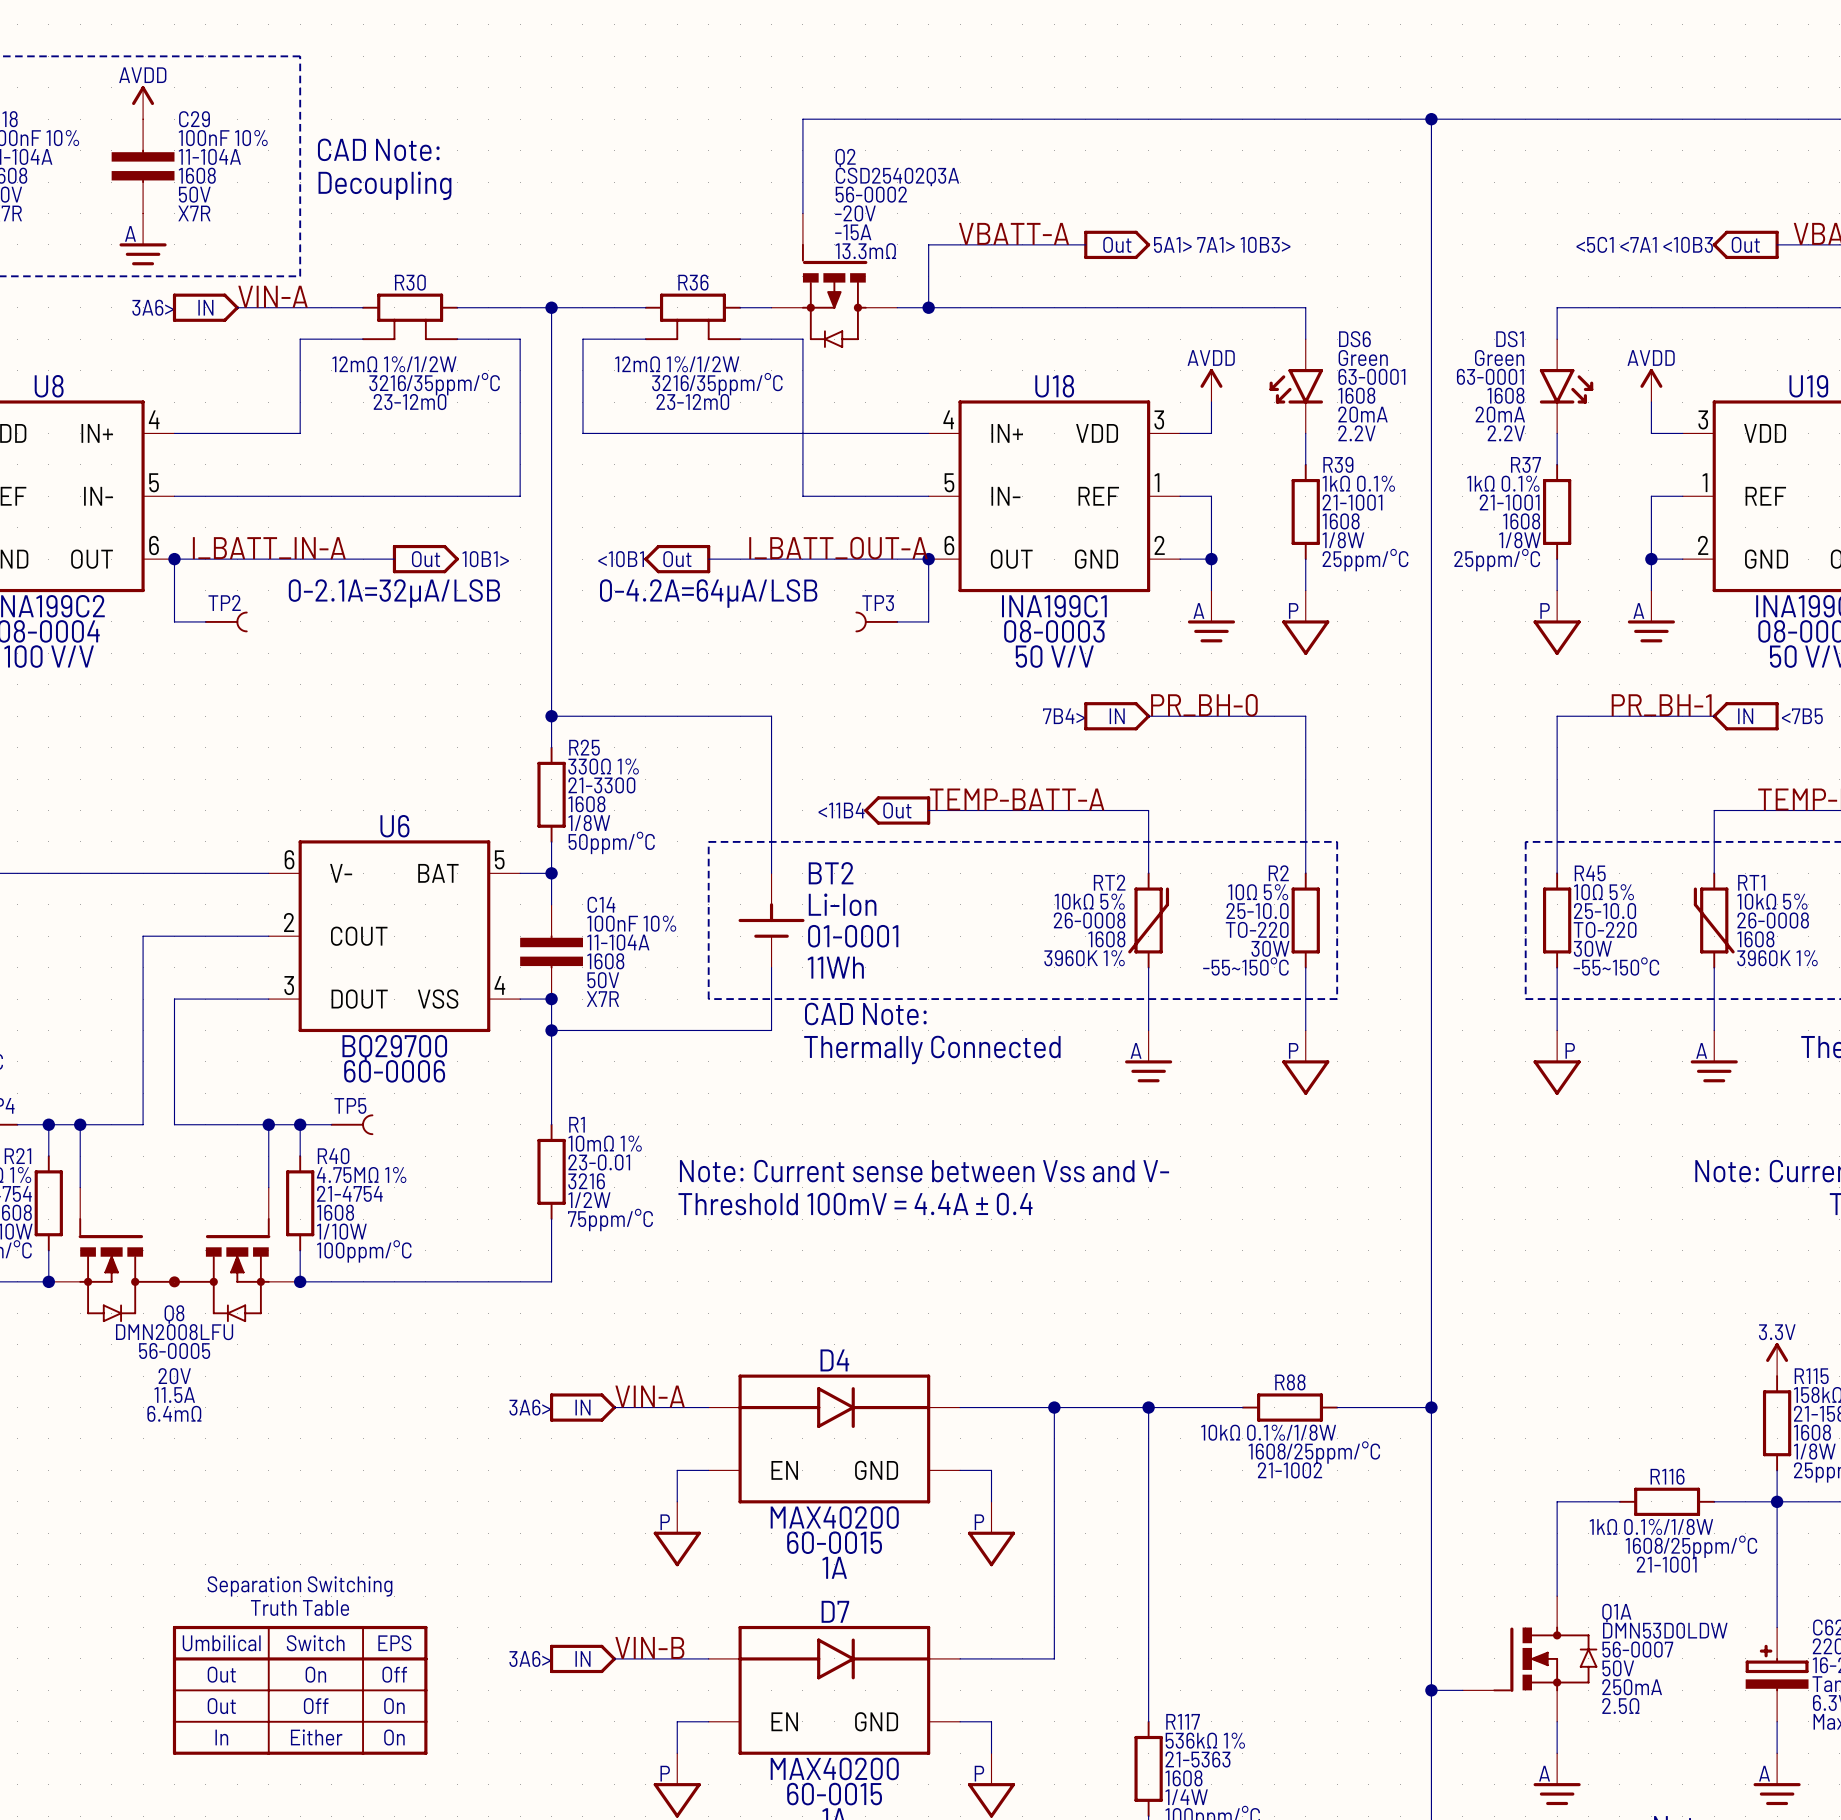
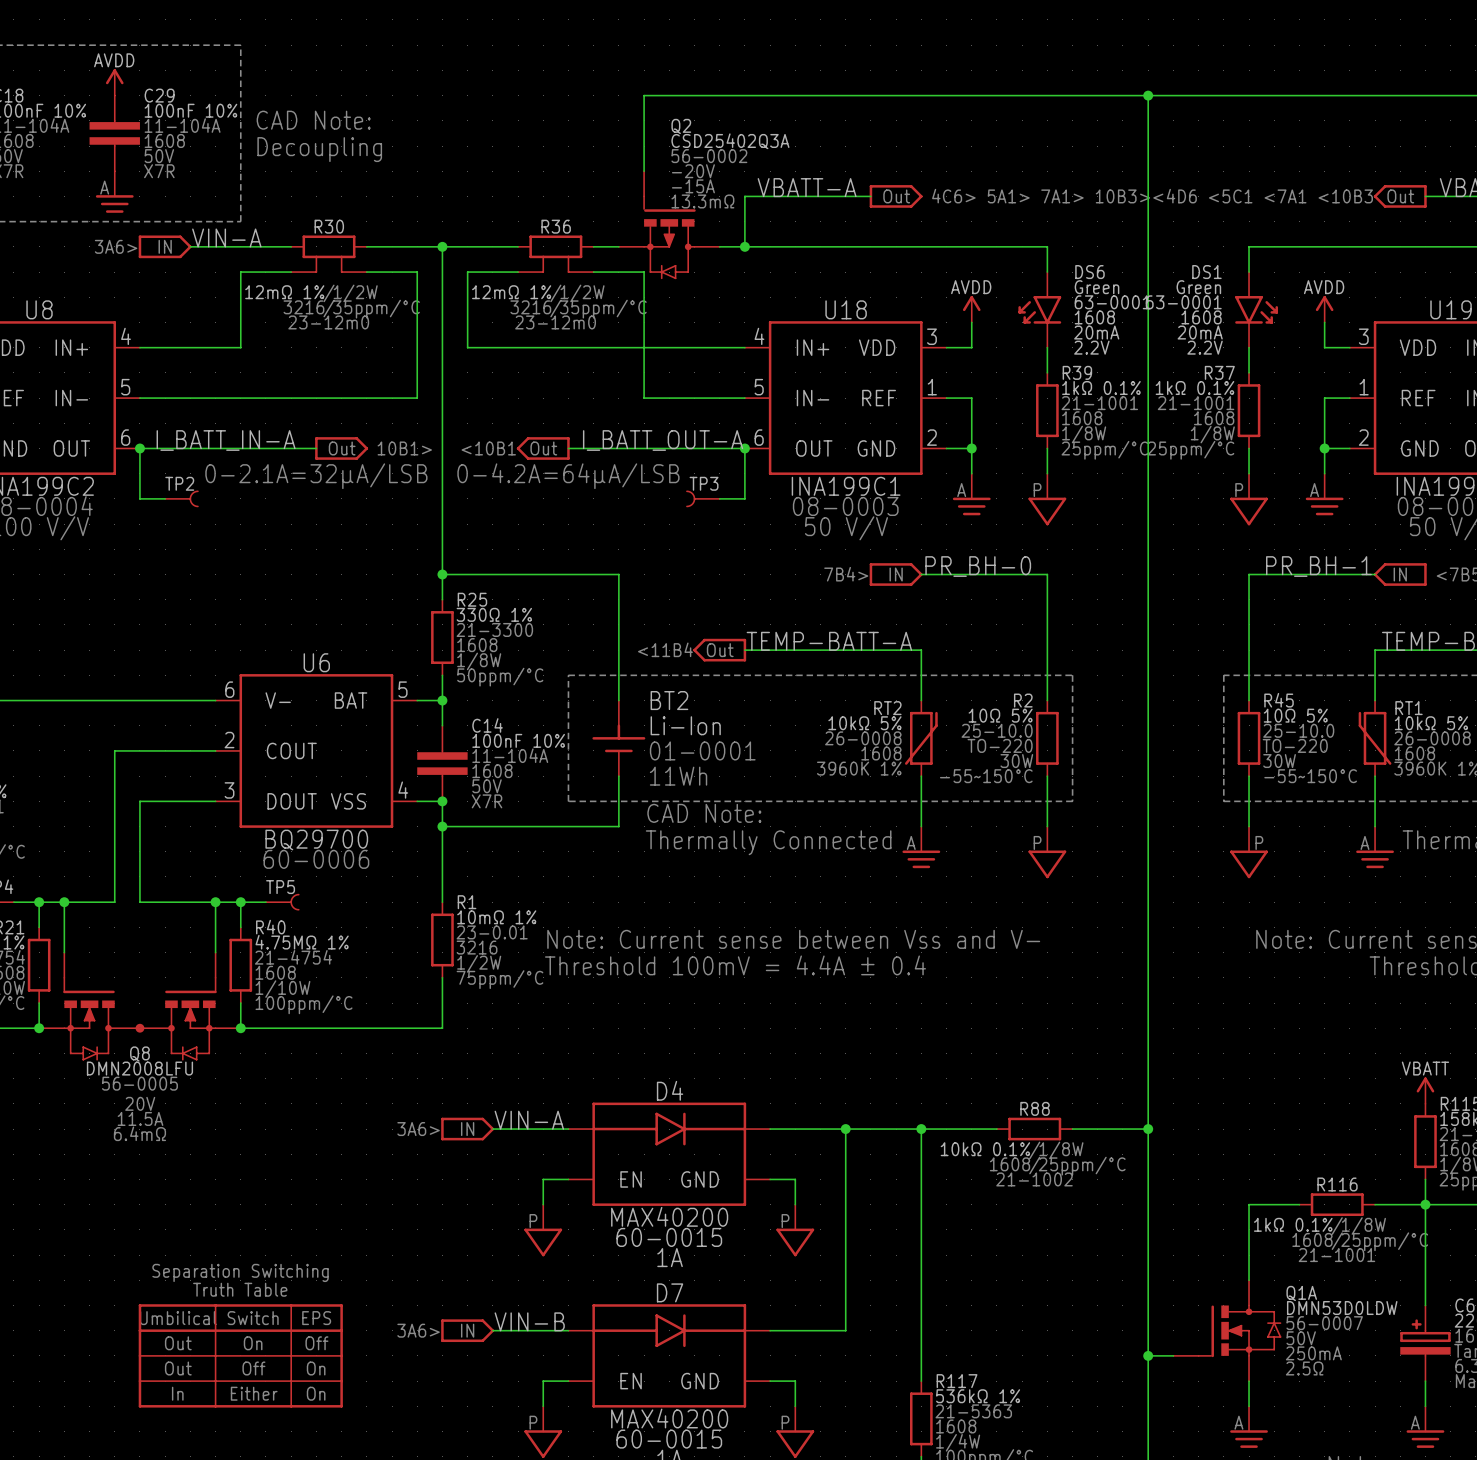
text: 5A1> 7A1> 10B3> (1222, 244) -> 4C6> 5A1> 7A1> 10B3> (1041, 196)
text: <5C1 <7A1 <10B3 (1644, 244) -> <4D6 <5C1 <7A1 <10B3 (1263, 196)
power symbol: 3.3V (1777, 1359) -> VBATT (1425, 1090)

